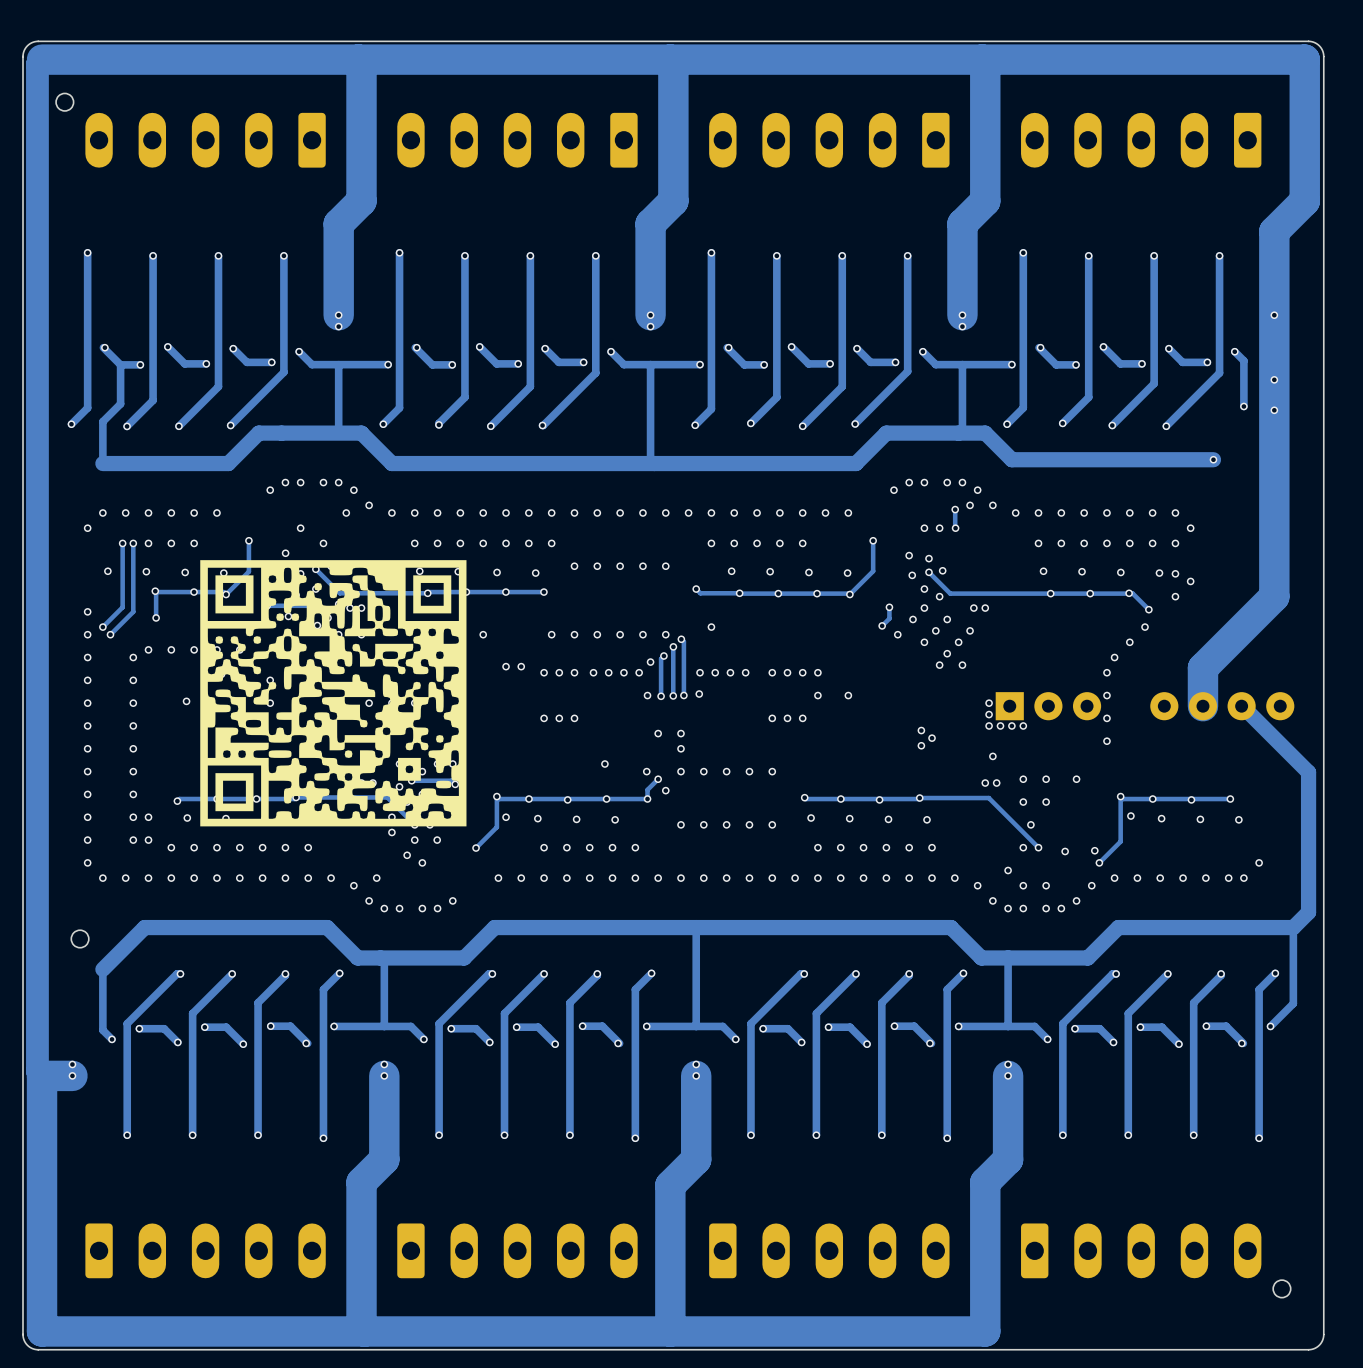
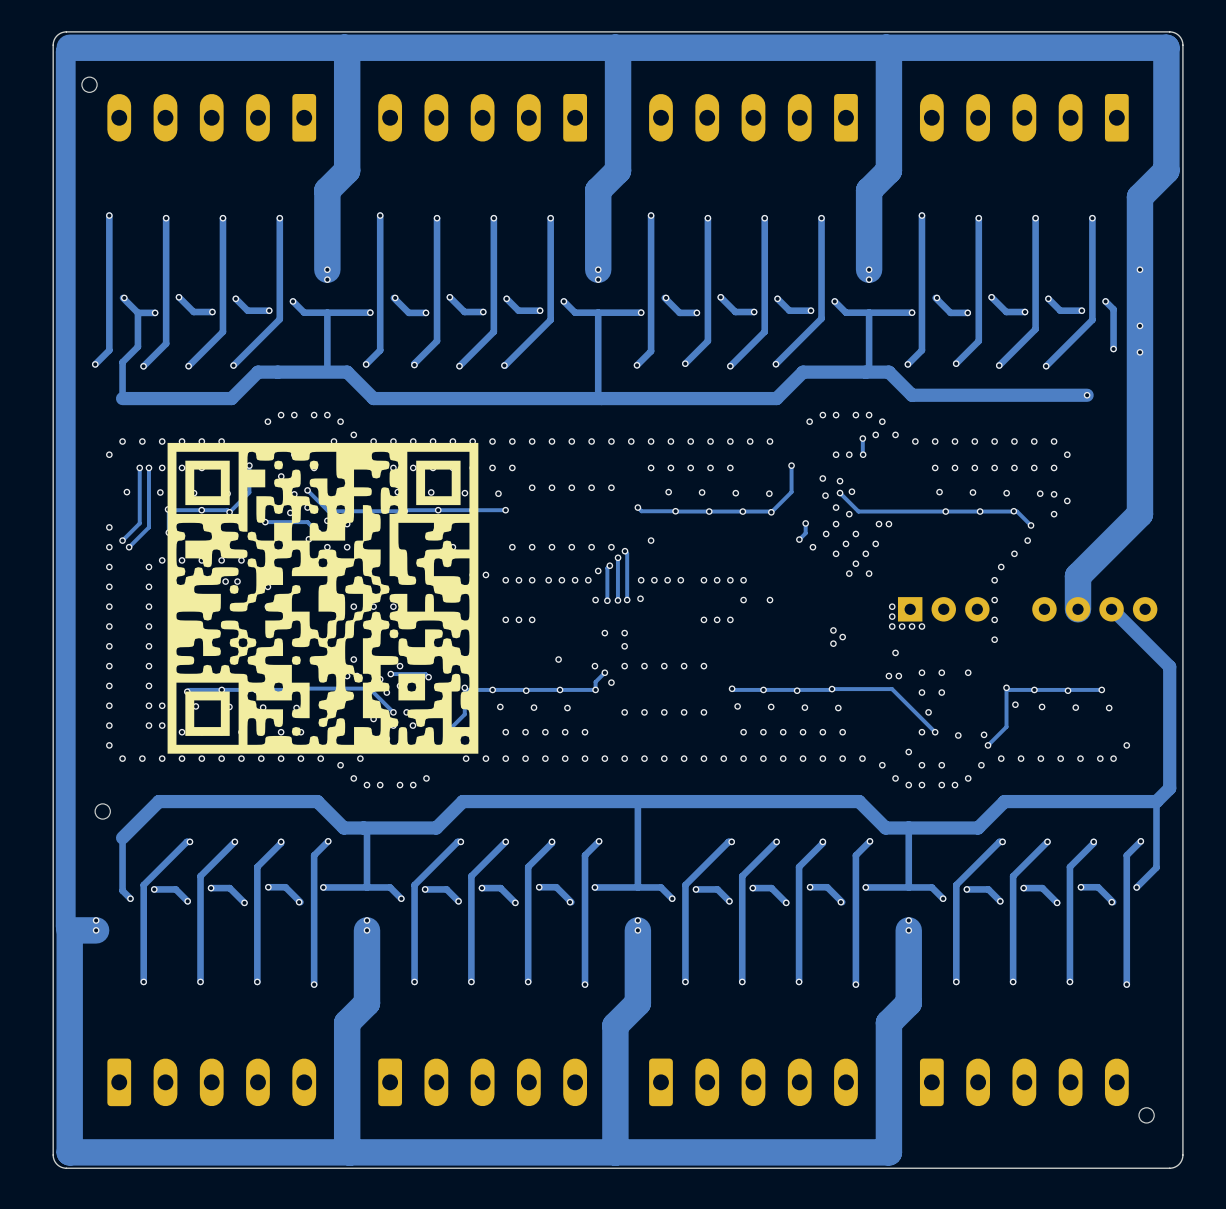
drawing shape: [200, 560, 467, 827] -> [167, 442, 479, 754]

